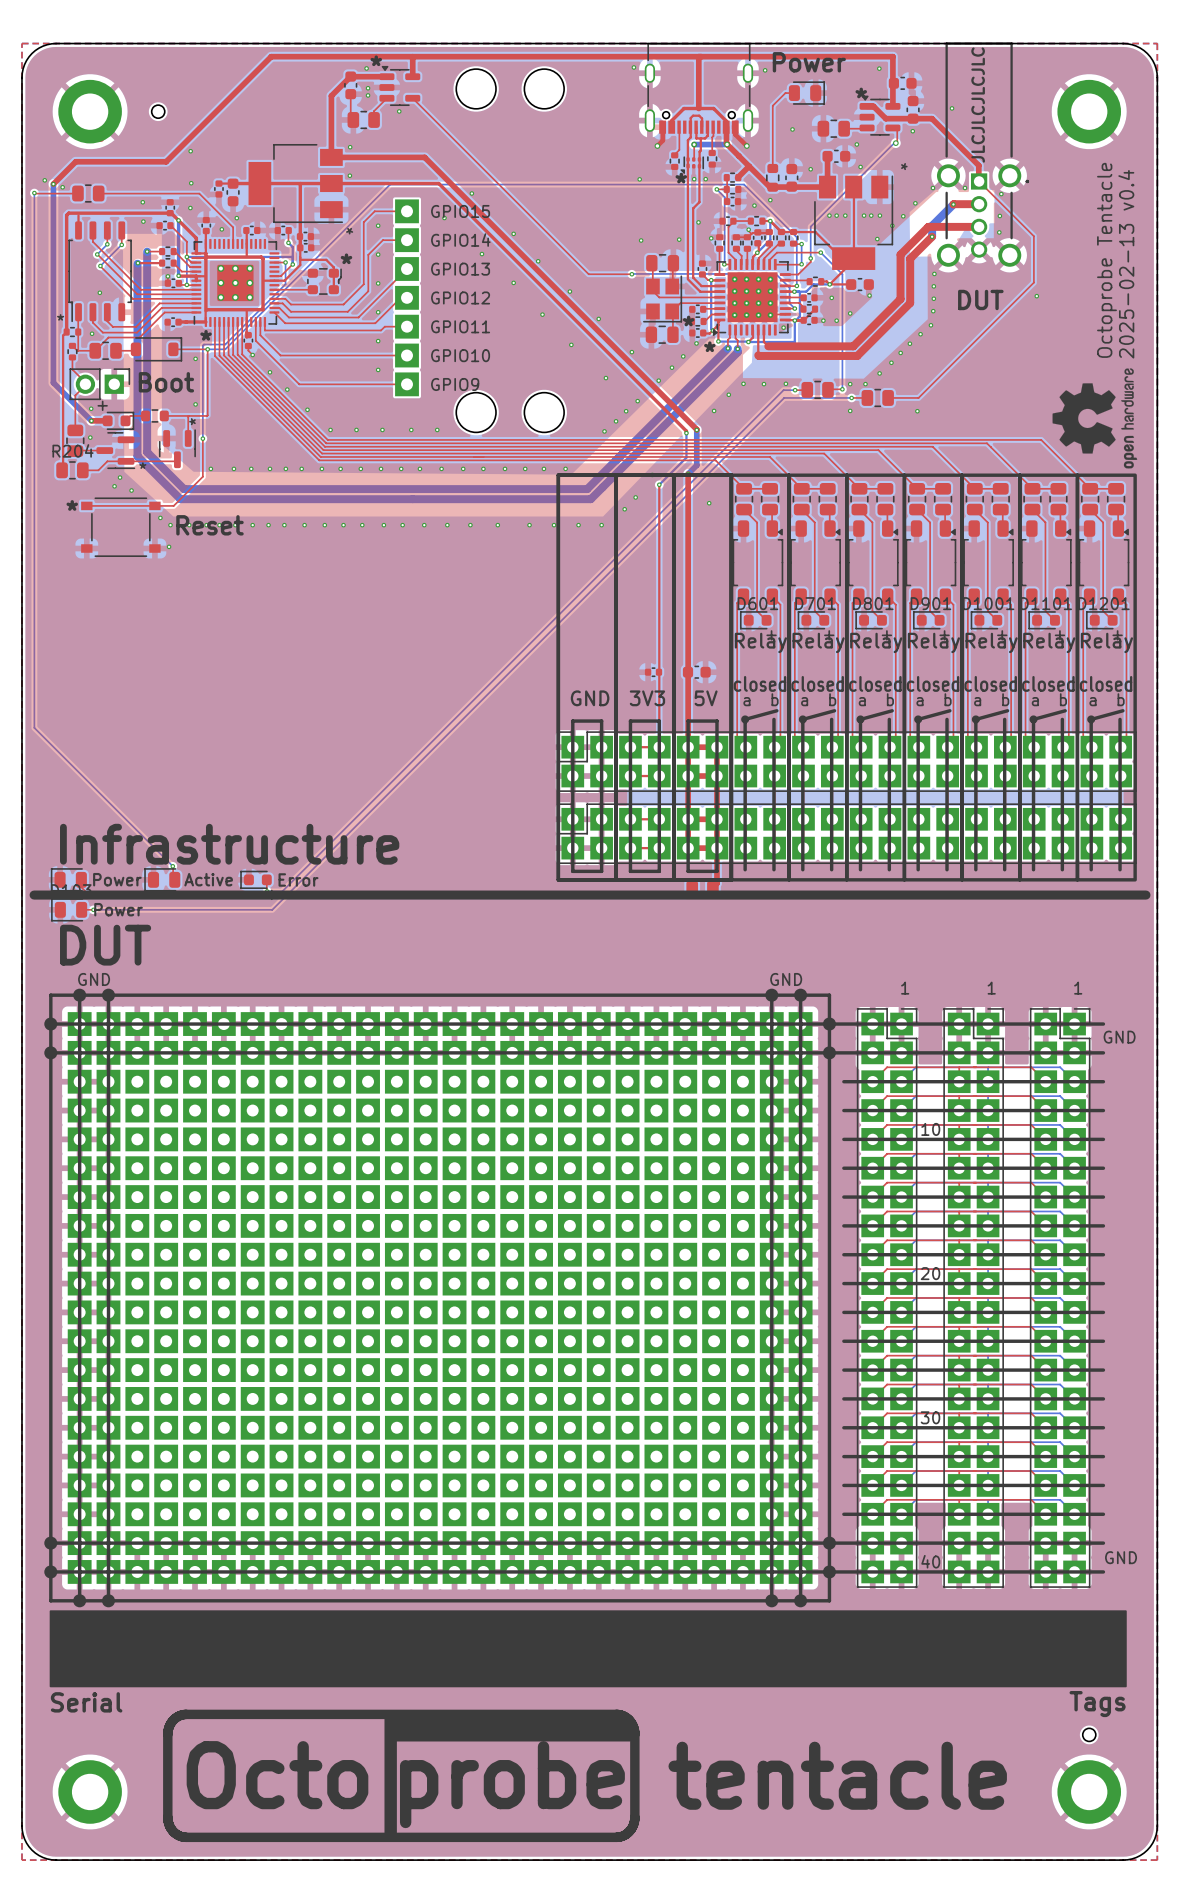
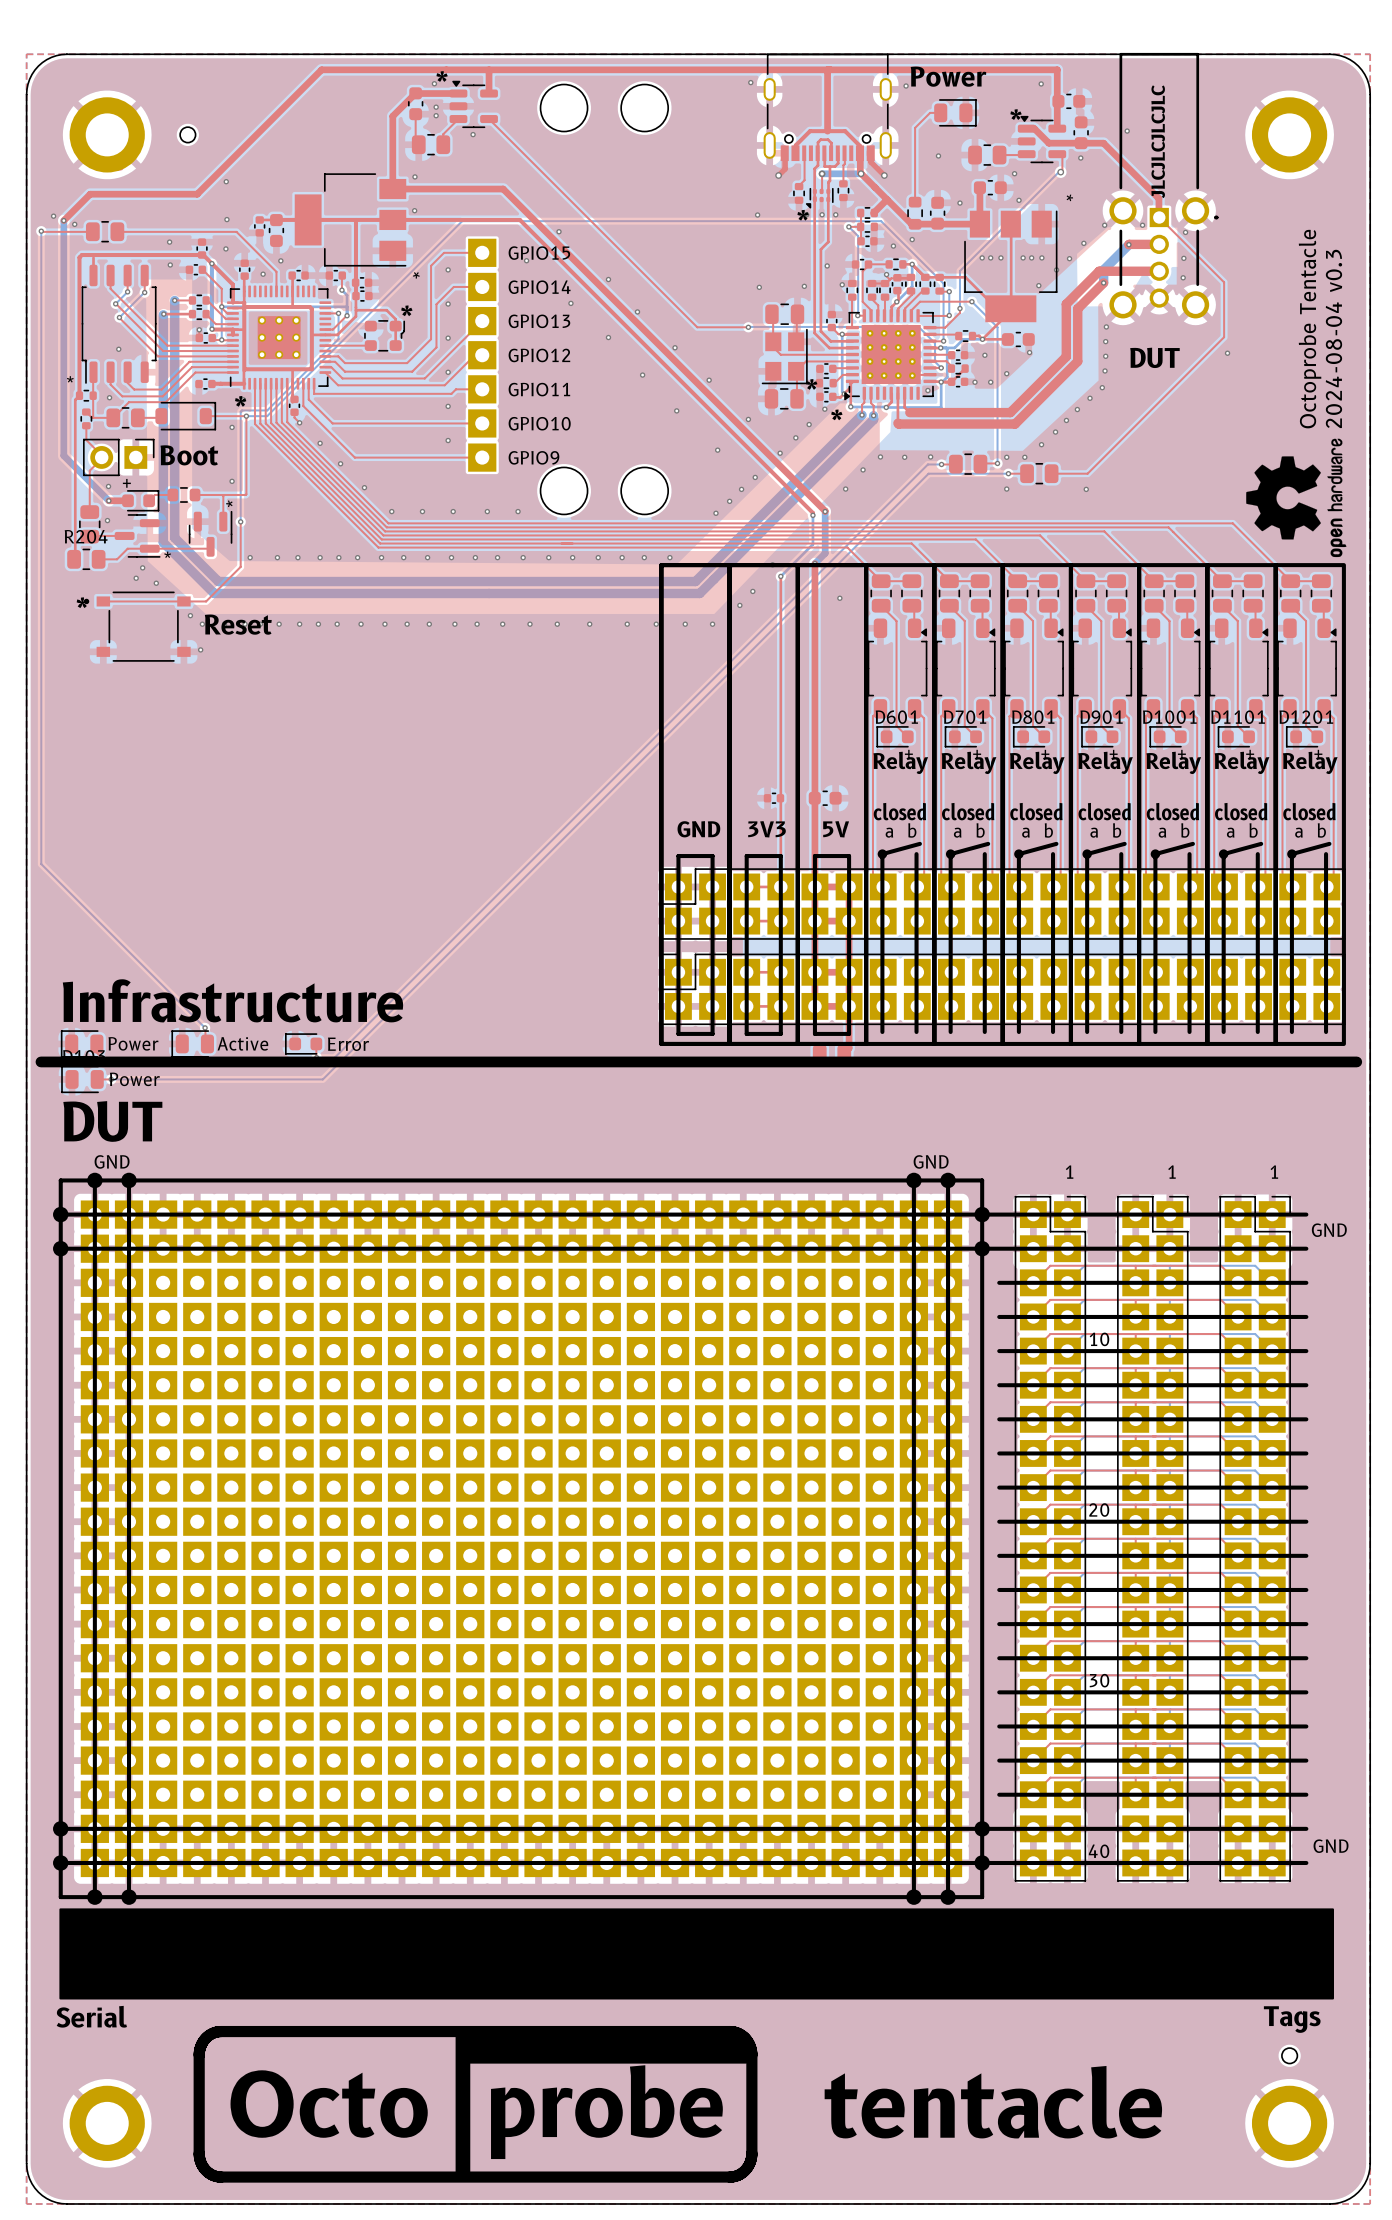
text: 2025-02-13 v0.4 (1126, 264) -> 2024-08-04 v0.3 (1333, 338)

